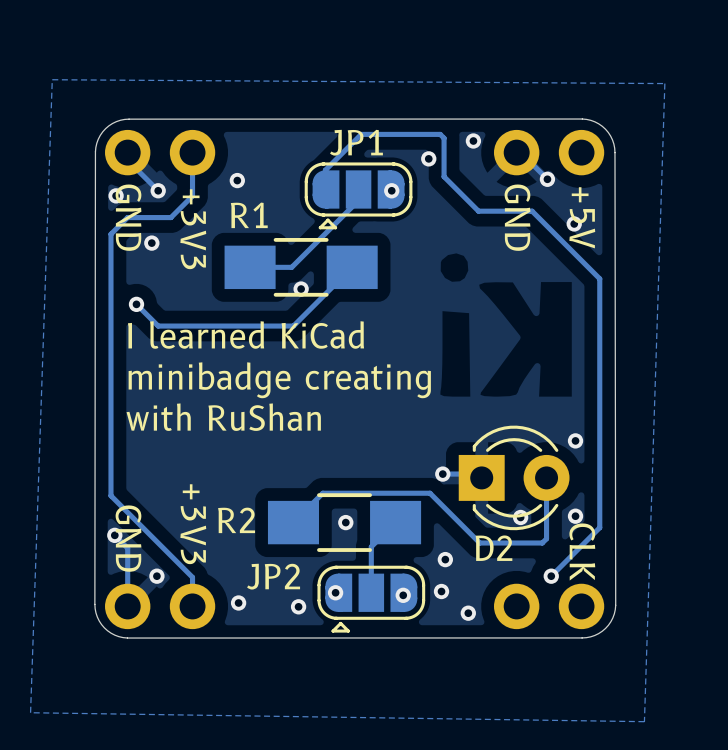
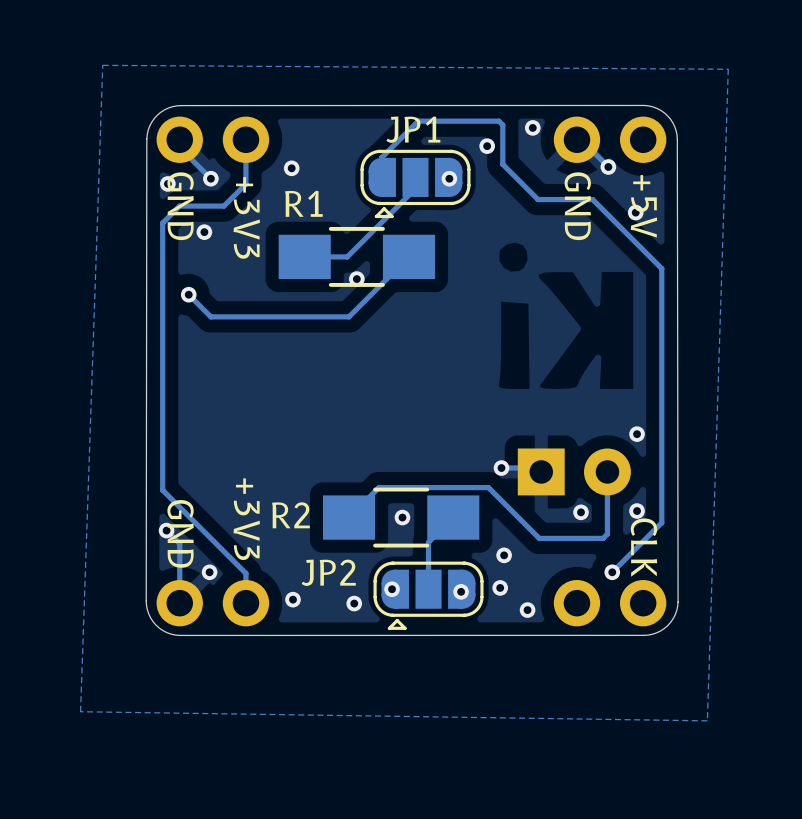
text: I learned KiCad (246, 334) -> none
text: minibadge creating (279, 380) -> none
text: with RuShan (223, 417) -> none
D2 side: bottom (514, 477) -> top (574, 471)

